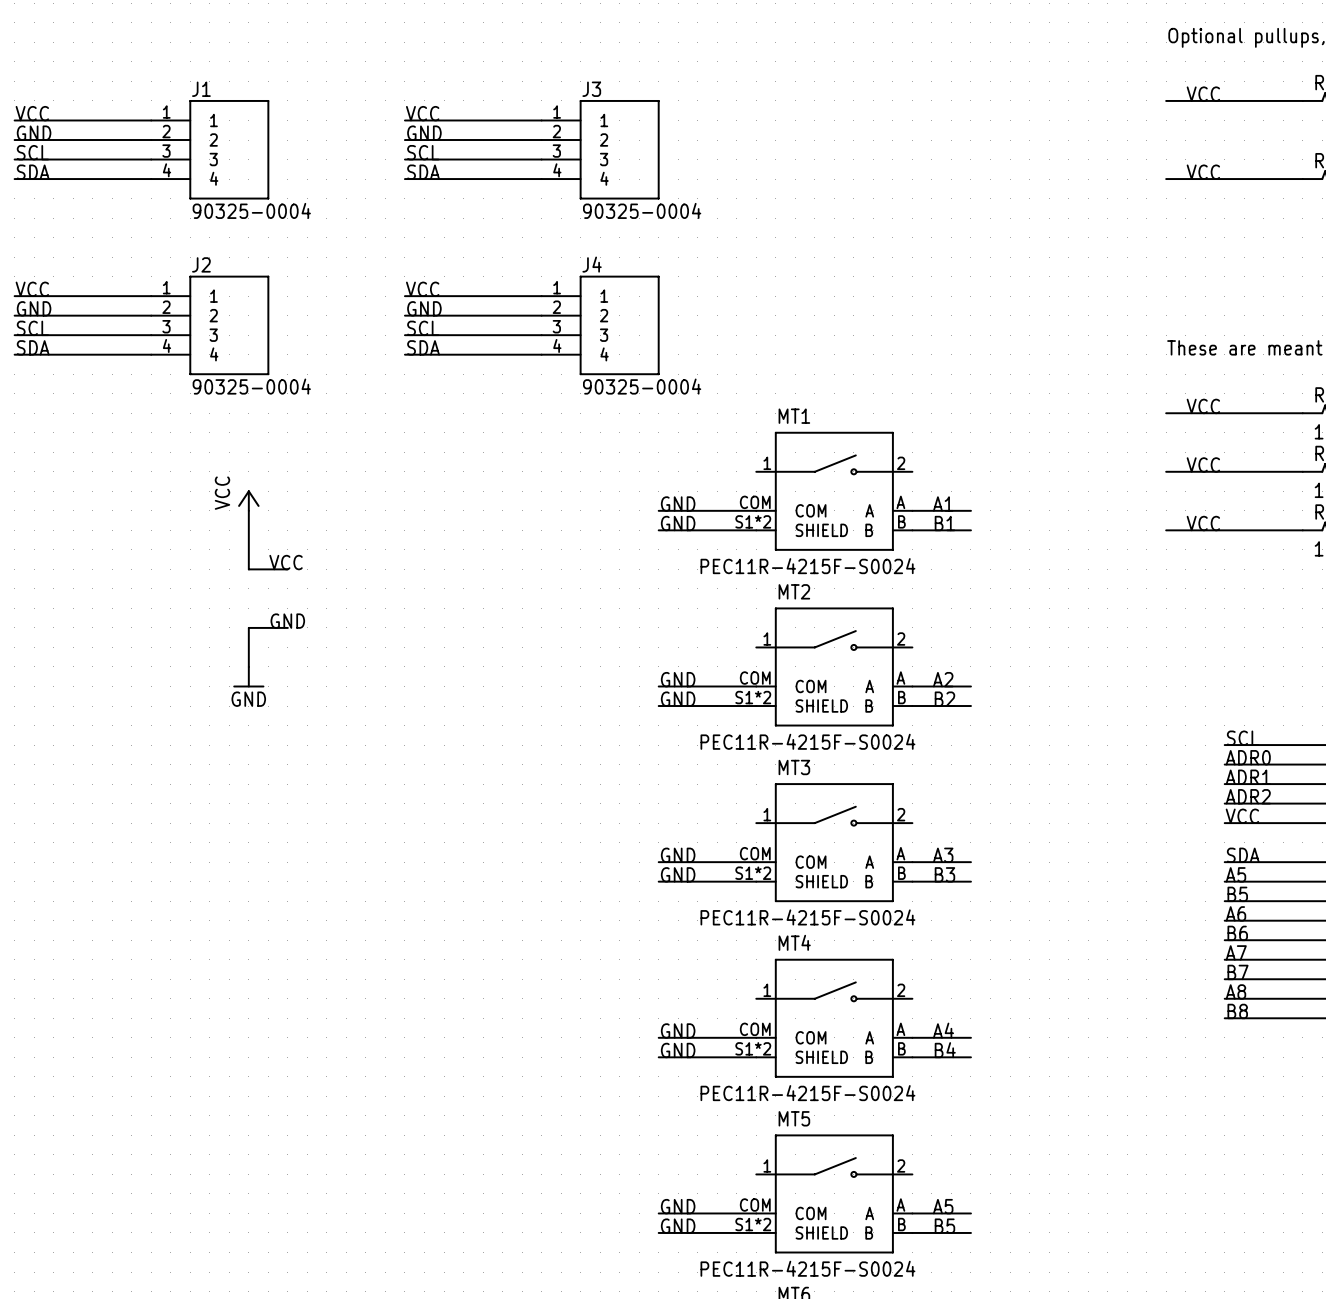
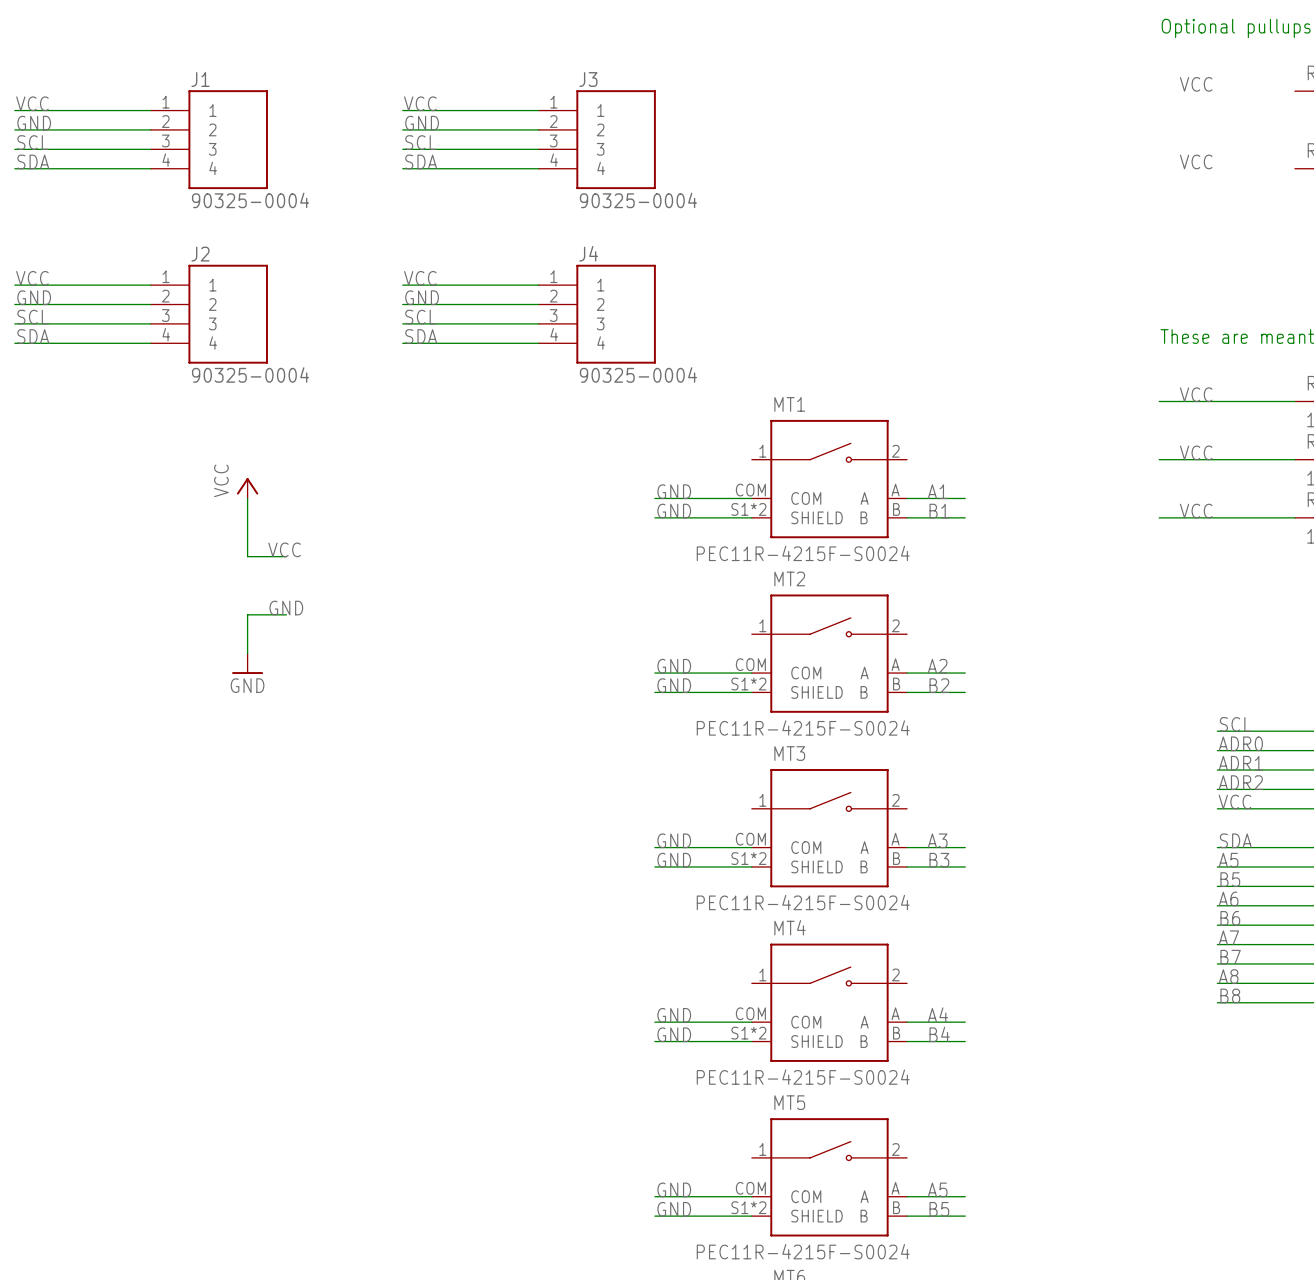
wire: (1166, 100) (1302, 100) -> none
wire: (1166, 179) (1302, 179) -> none

